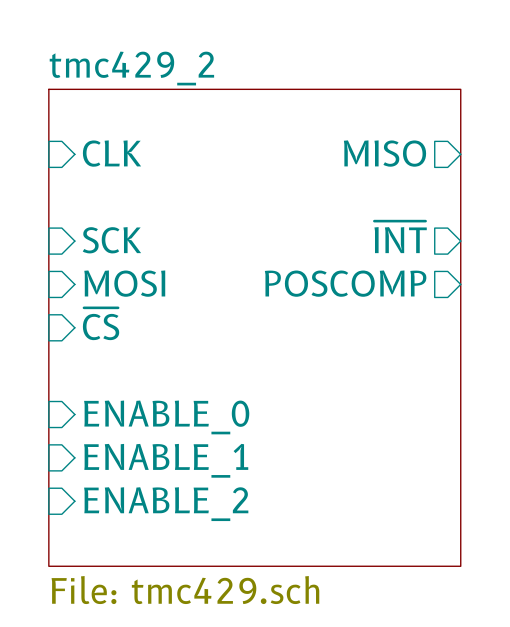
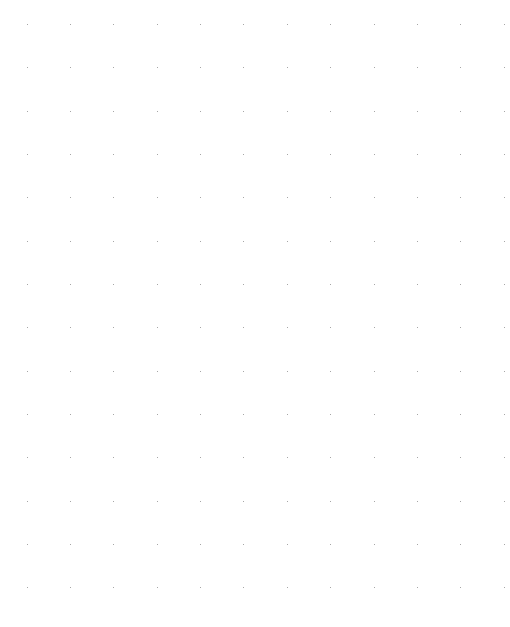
sheet pin: CLK (111, 153) -> none
sheet pin: MISO (384, 153) -> none
sheet pin: ~{INT} (400, 237) -> none
sheet pin: SCK (111, 240) -> none
sheet pin: MOSI (124, 283) -> none
sheet pin: POSCOMP (345, 283) -> none
sheet pin: ~{CS} (101, 323) -> none
sheet tmc429_2: File: tmc429.sch (254, 327) -> none
sheet pin: ENABLE_0 (166, 417) -> none
sheet pin: ENABLE_1 (166, 460) -> none
sheet pin: ENABLE_2 (166, 504) -> none

